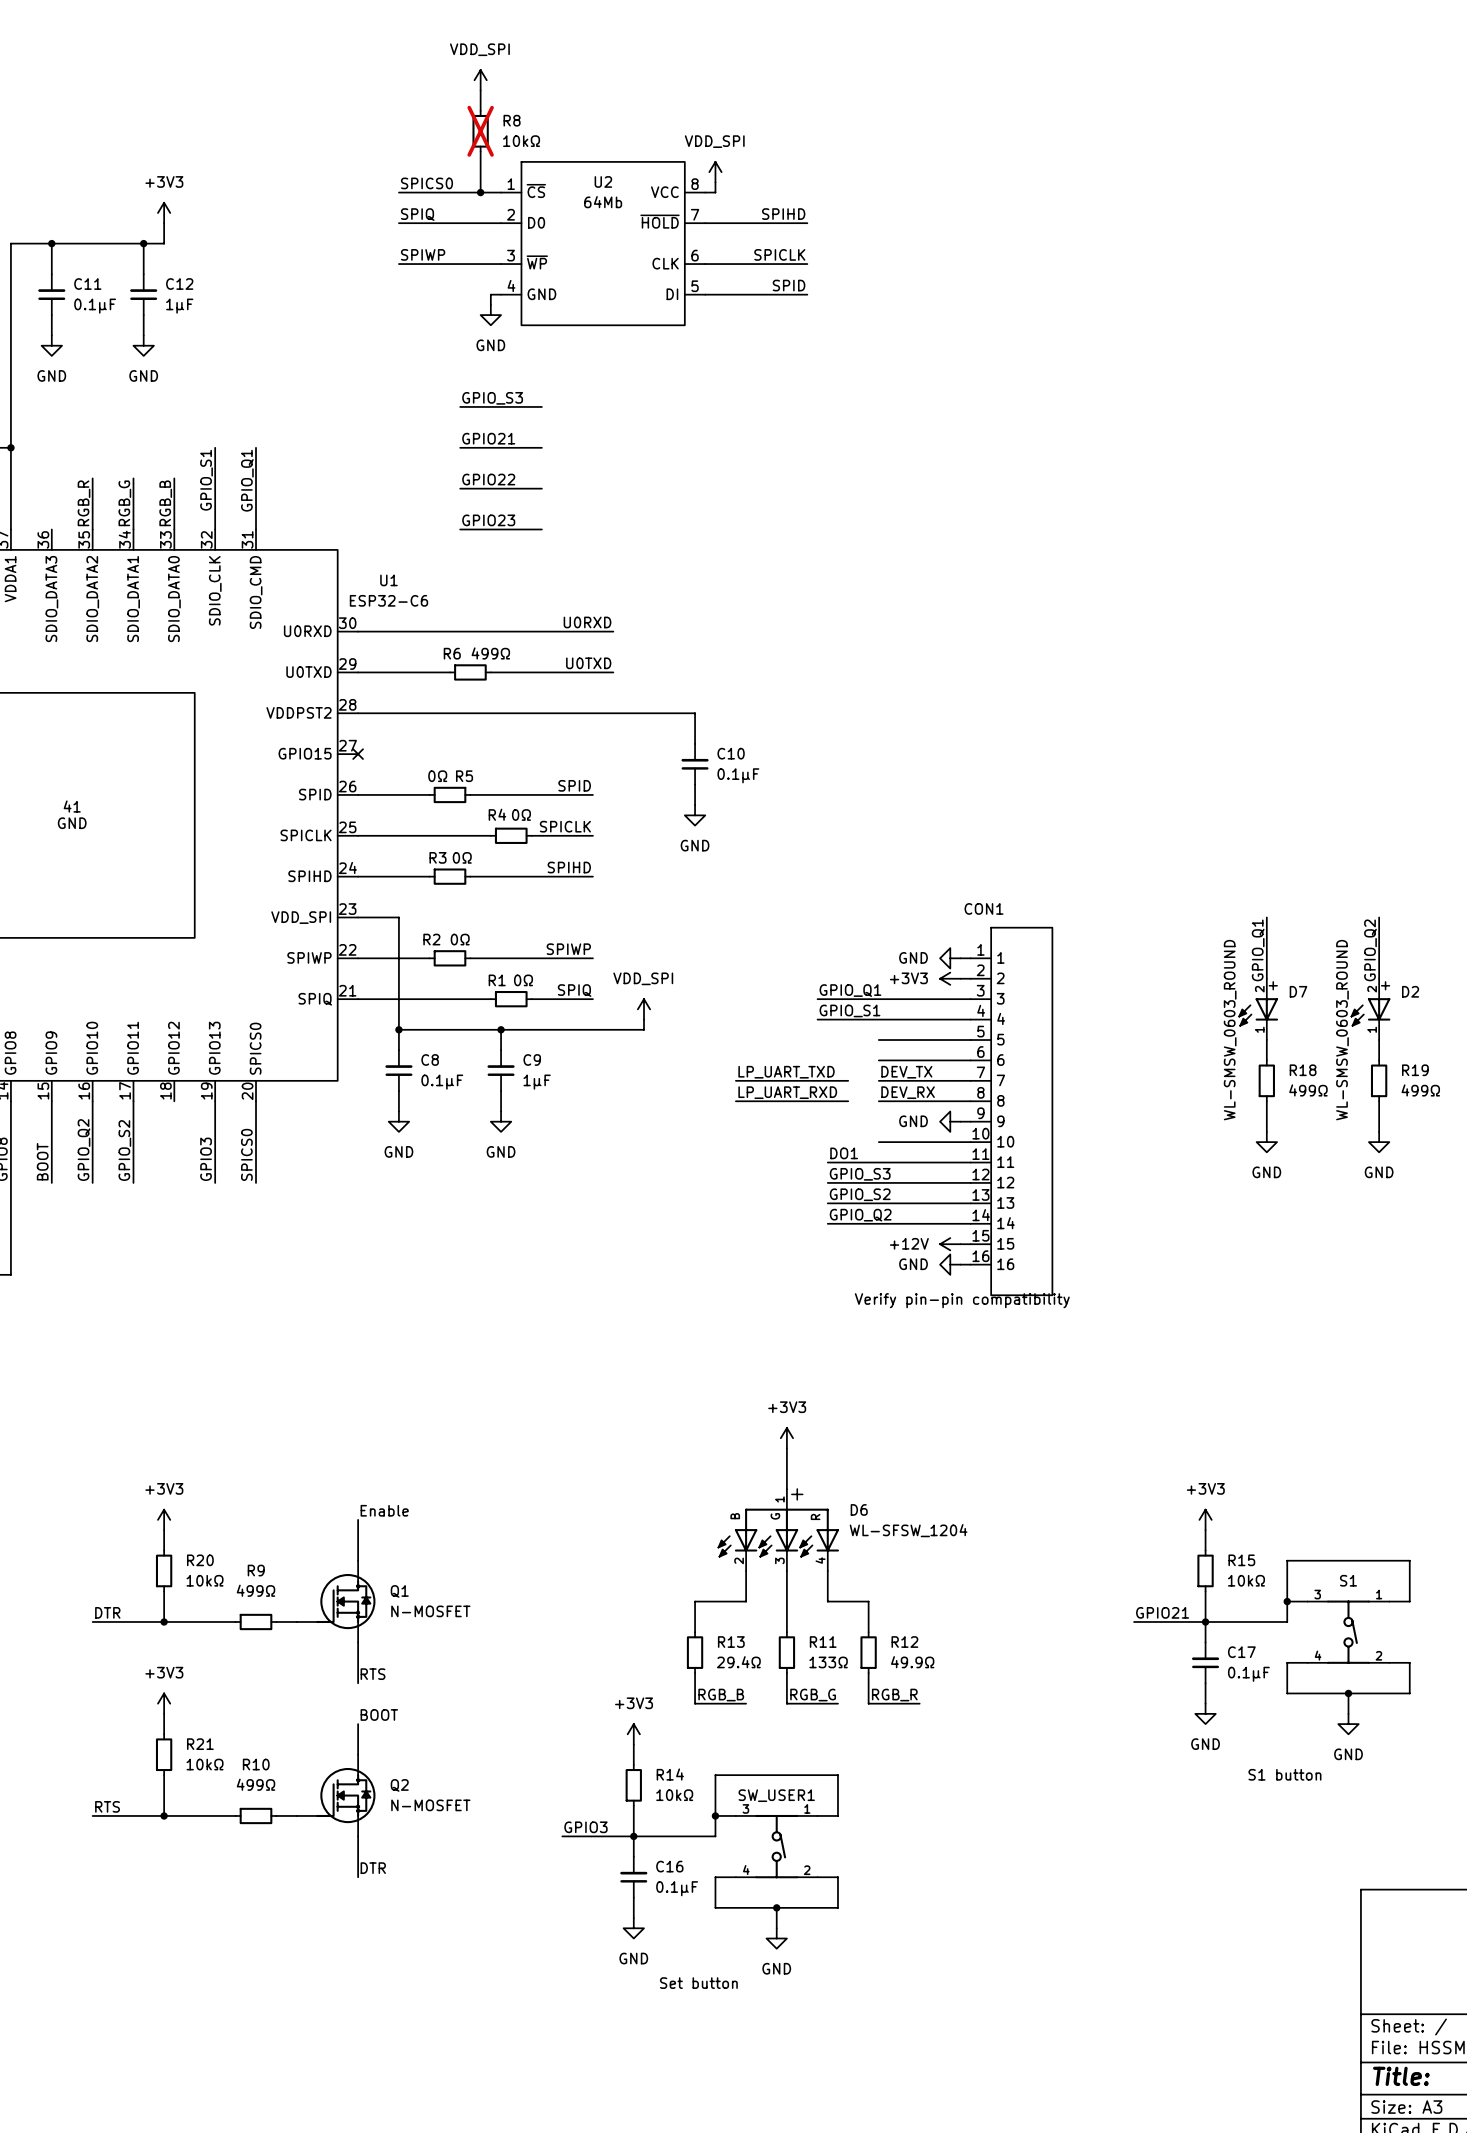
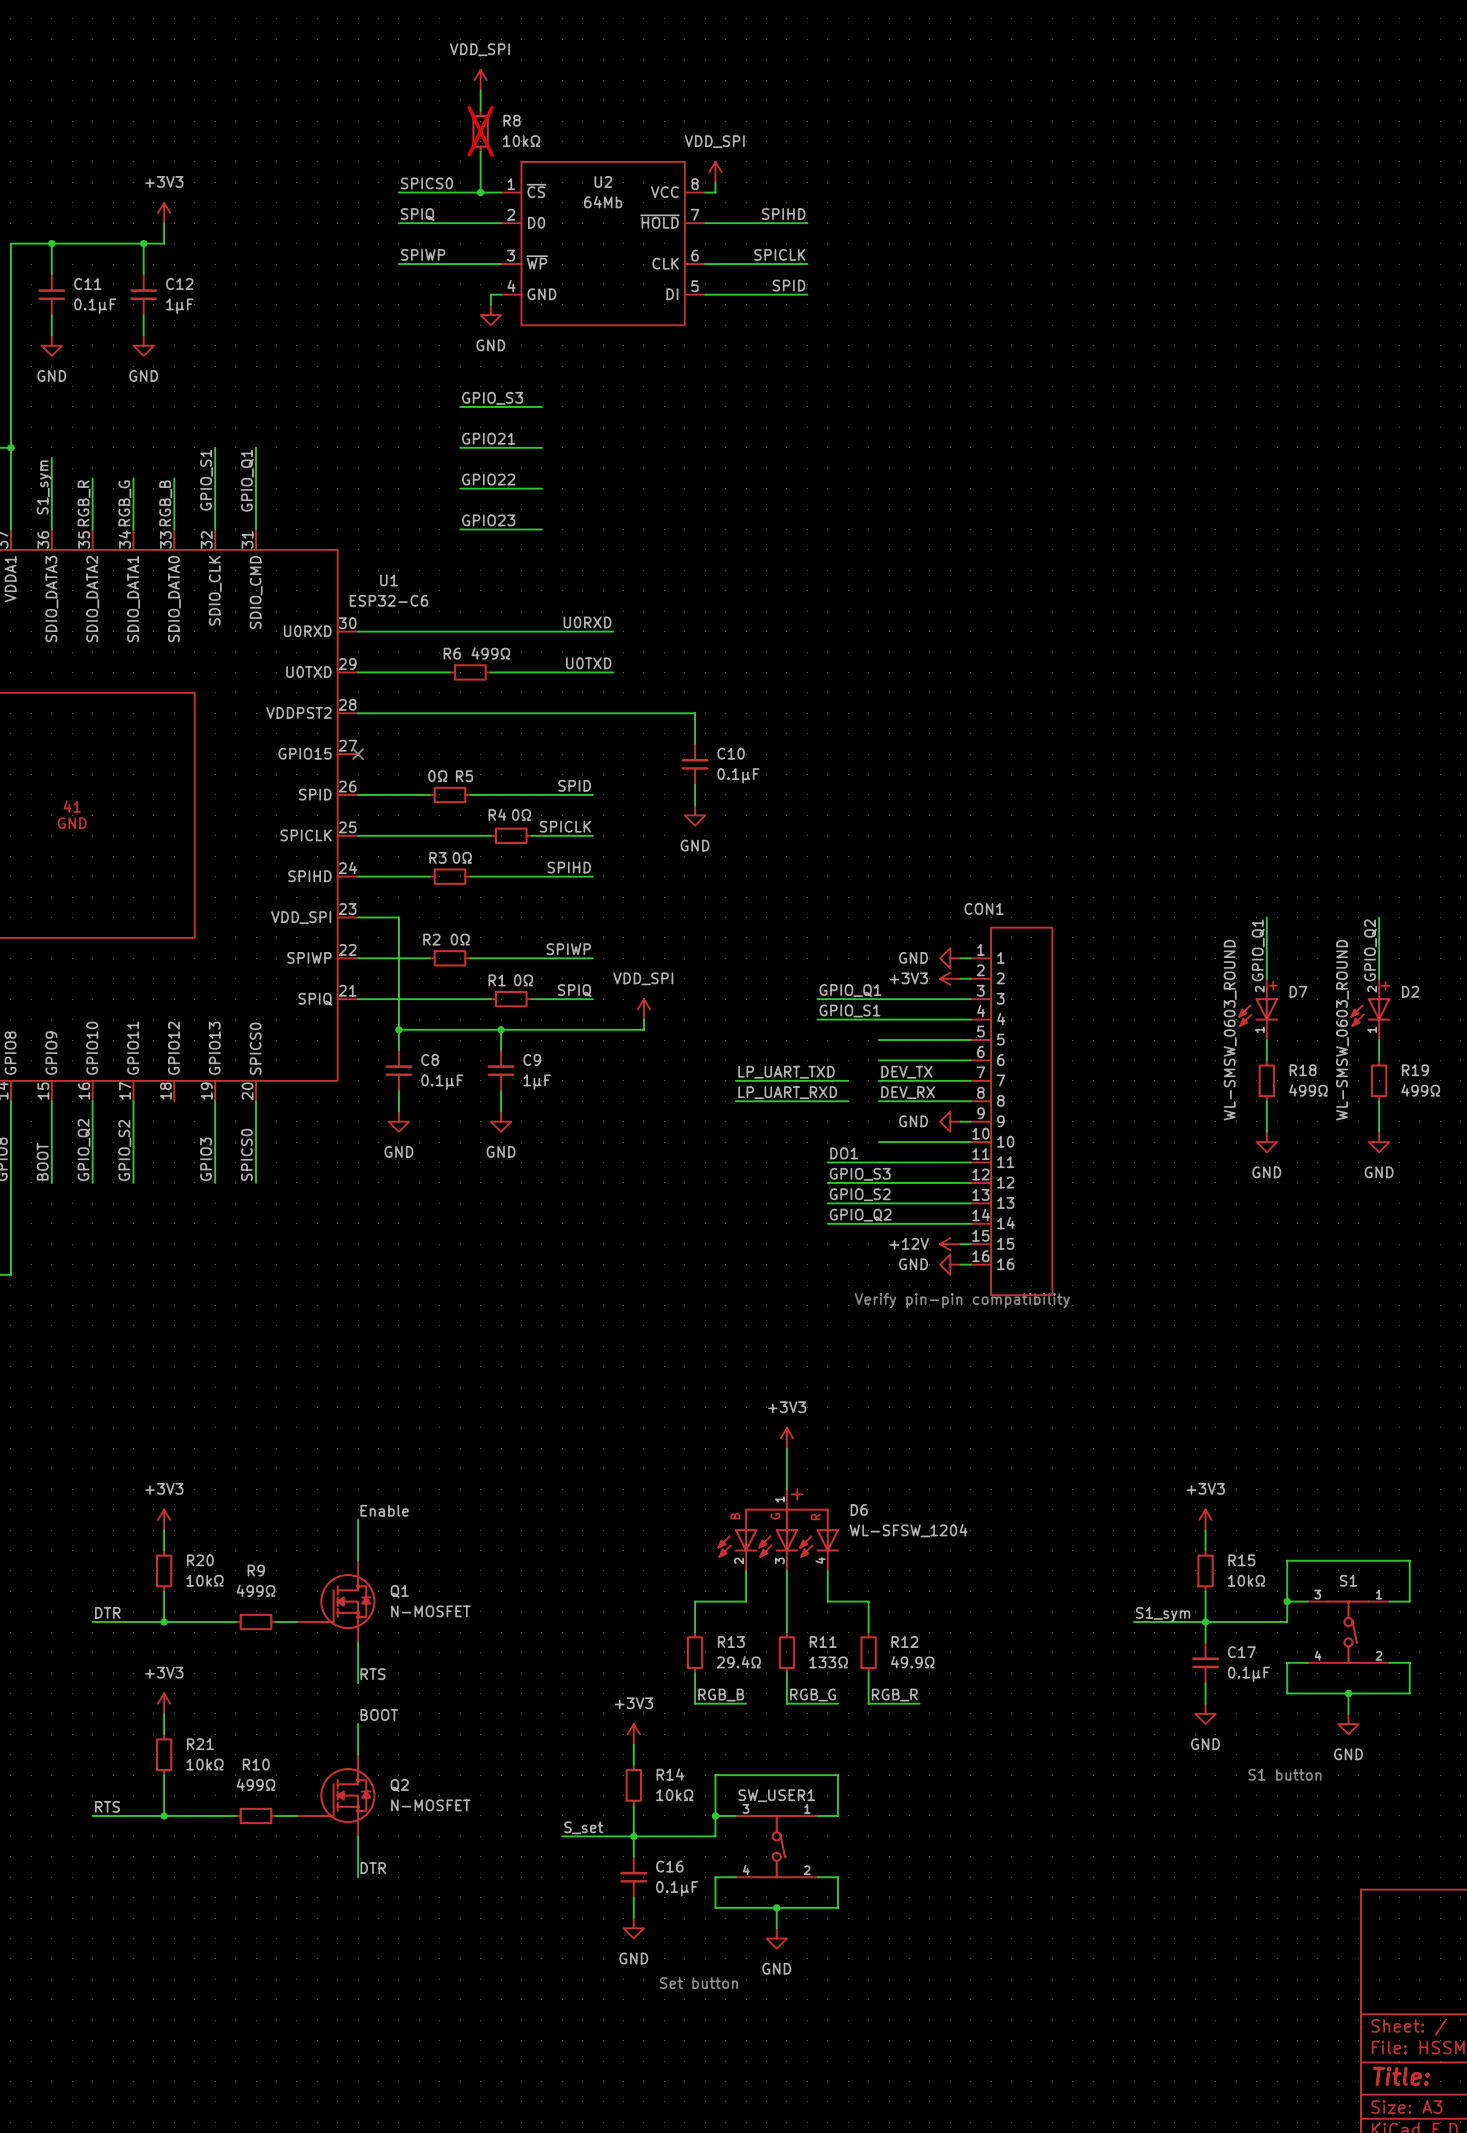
wire: none -> (51, 458) (51, 529)
label: none -> S1_sym (44, 487)
label: GPIO21 (1162, 1612) -> S1_sym (1163, 1614)
label: GPIO3 (585, 1827) -> S_set (583, 1827)

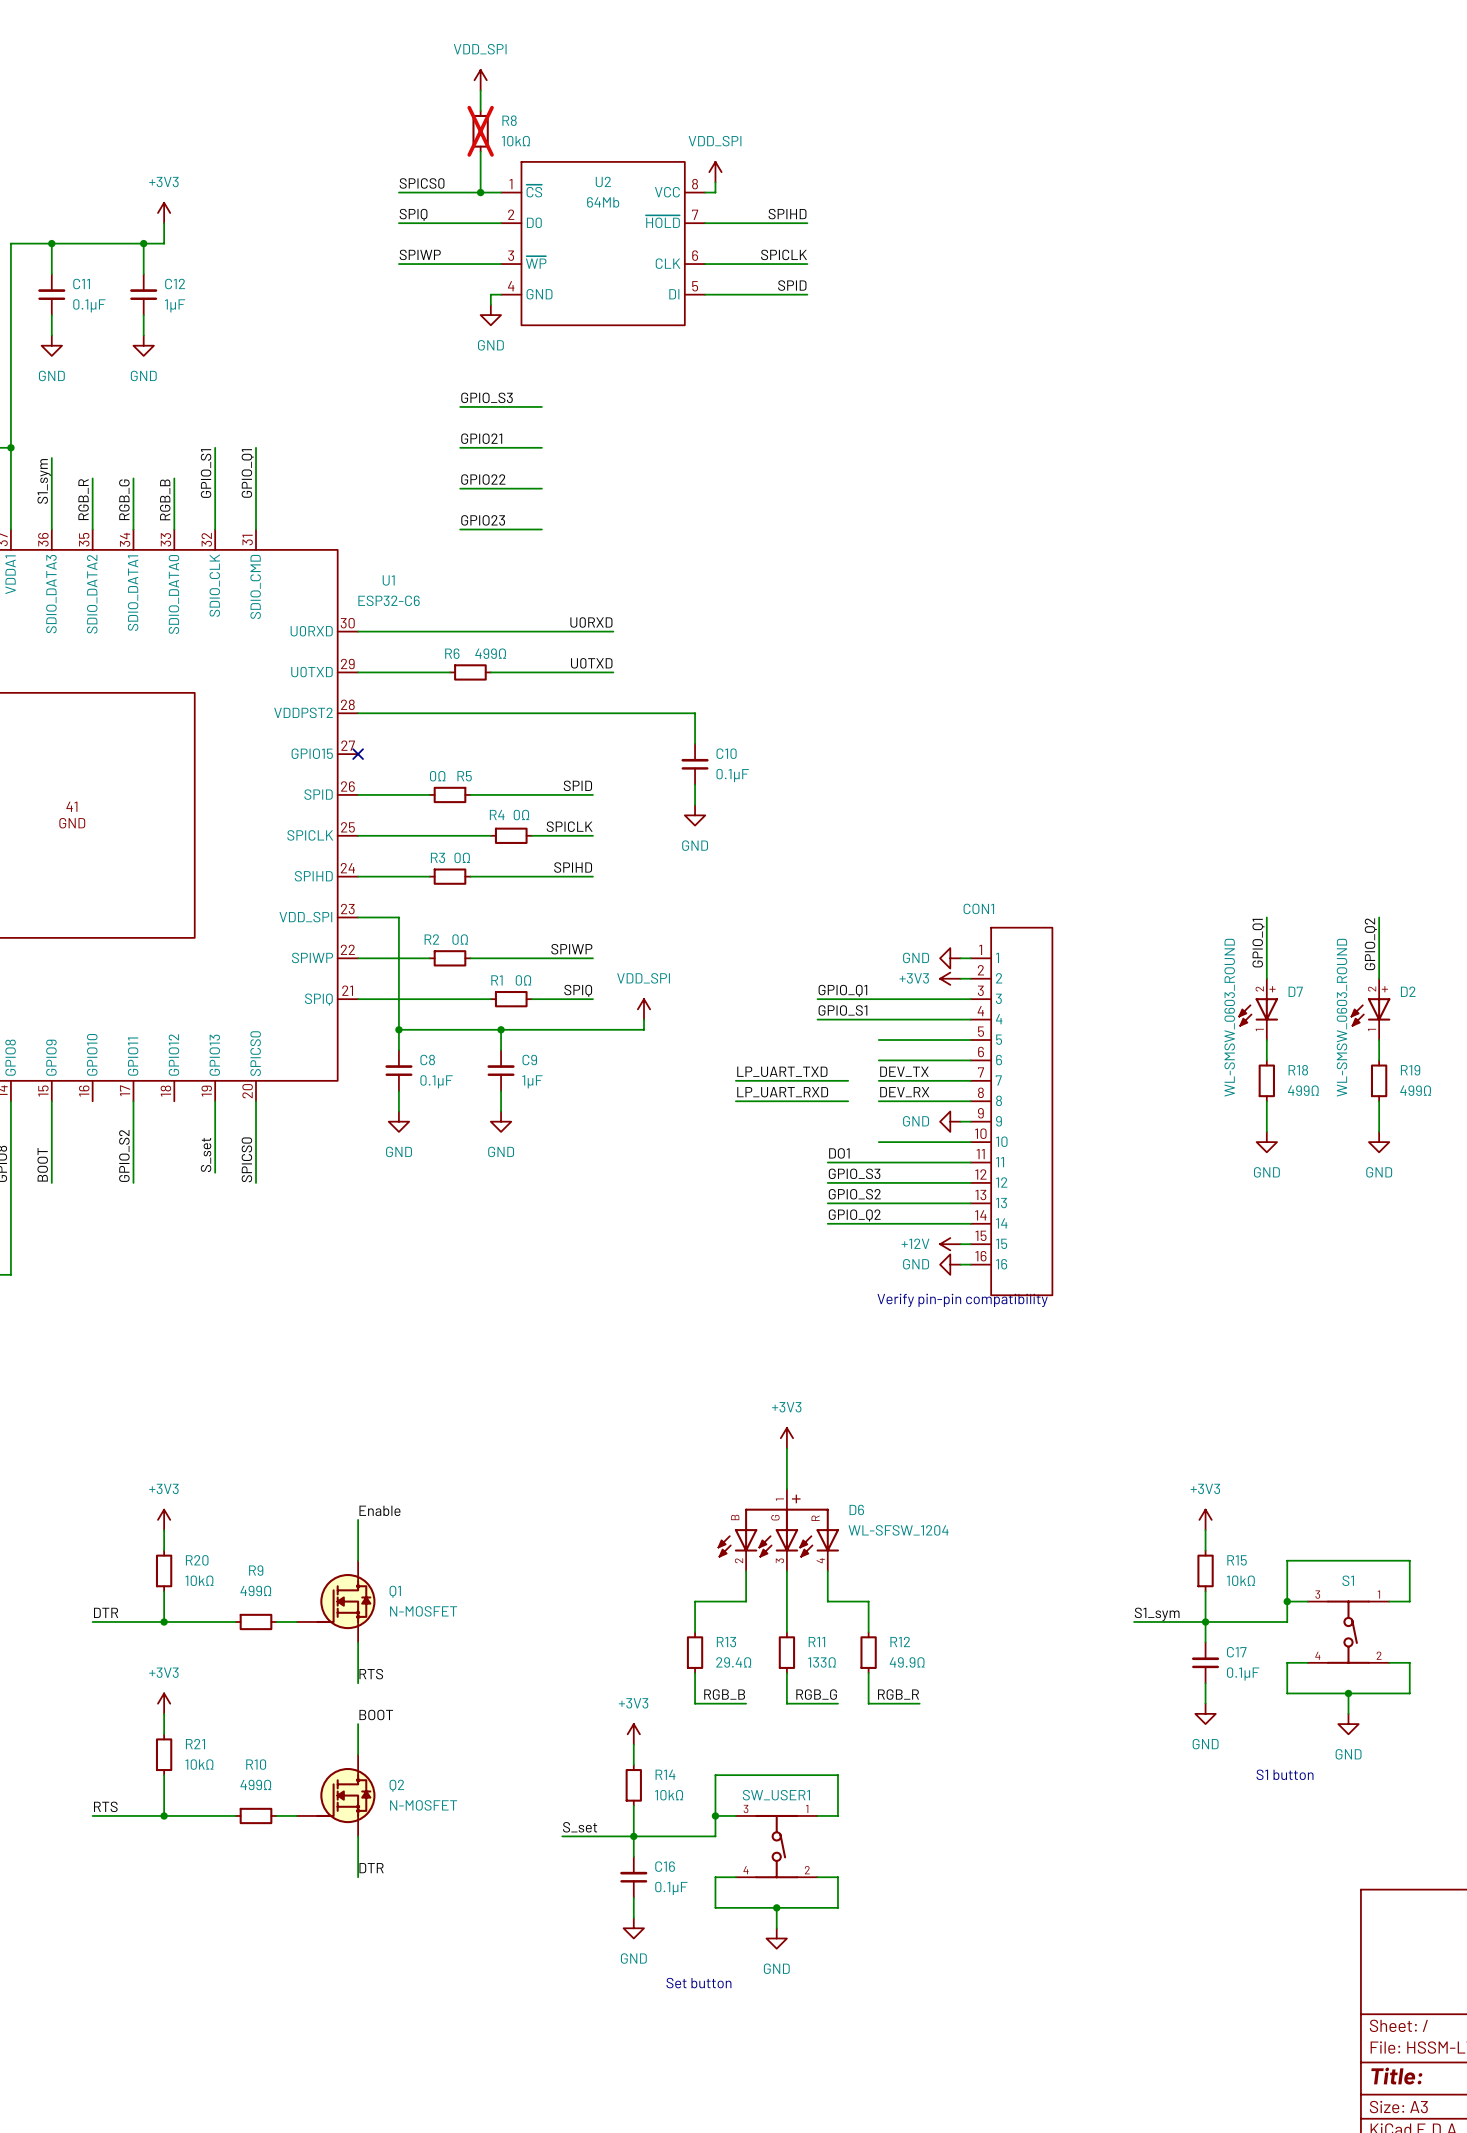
wire: (92, 1101) (92, 1182) -> none
label: GPIO_Q2 (84, 1150) -> none
label: none -> S_set (206, 1154)
label: GPIO3 (206, 1159) -> none
wire: (215, 1172) (215, 1182) -> none

